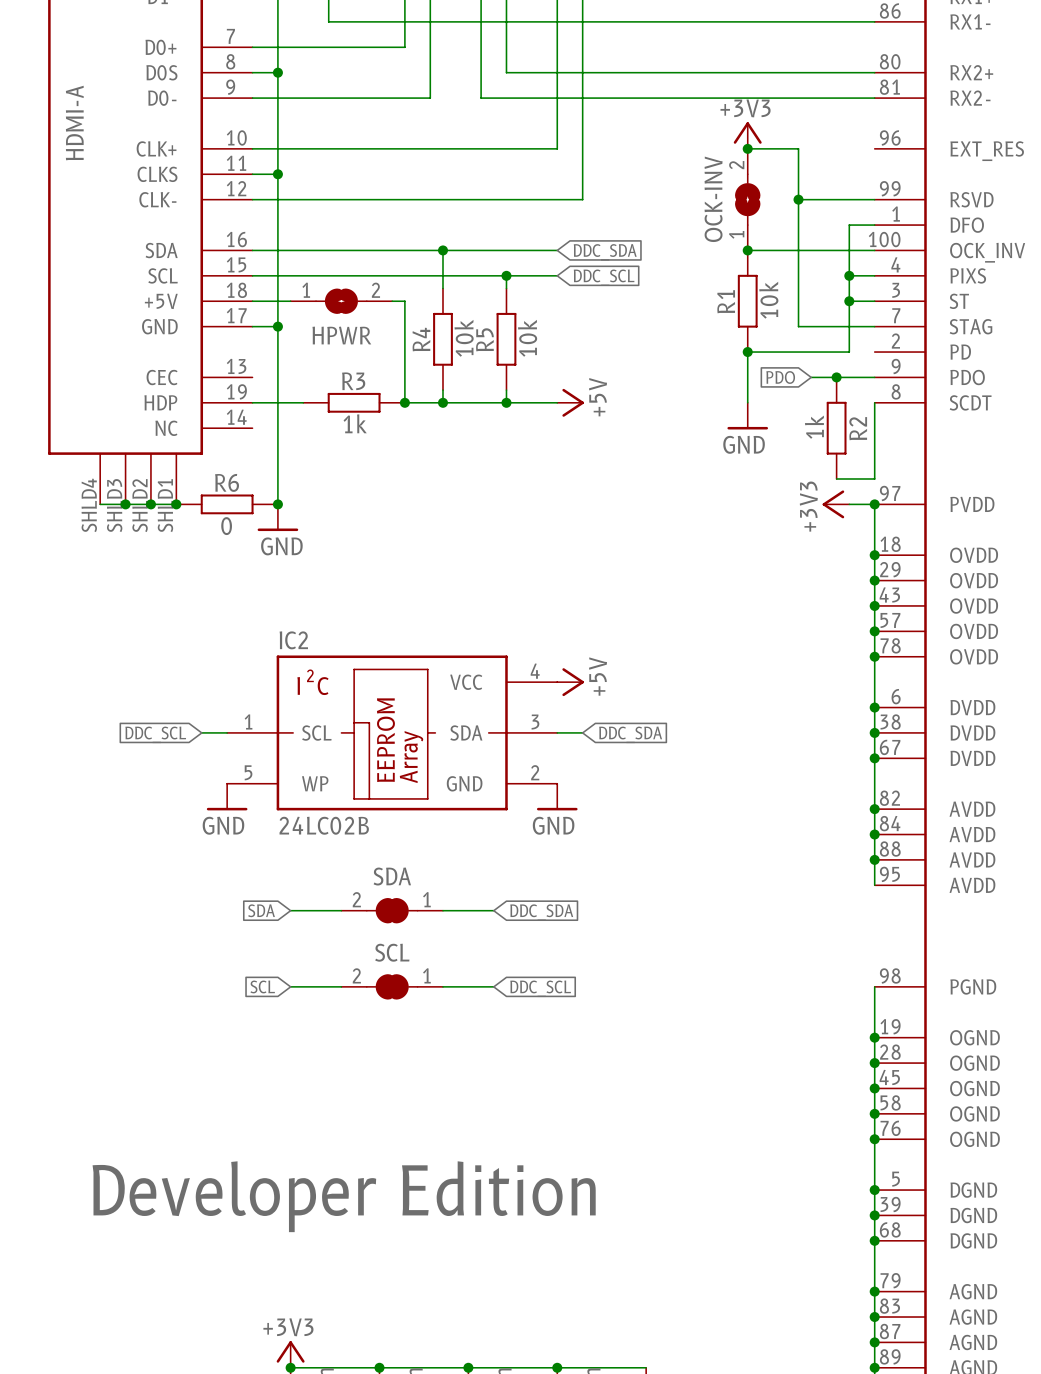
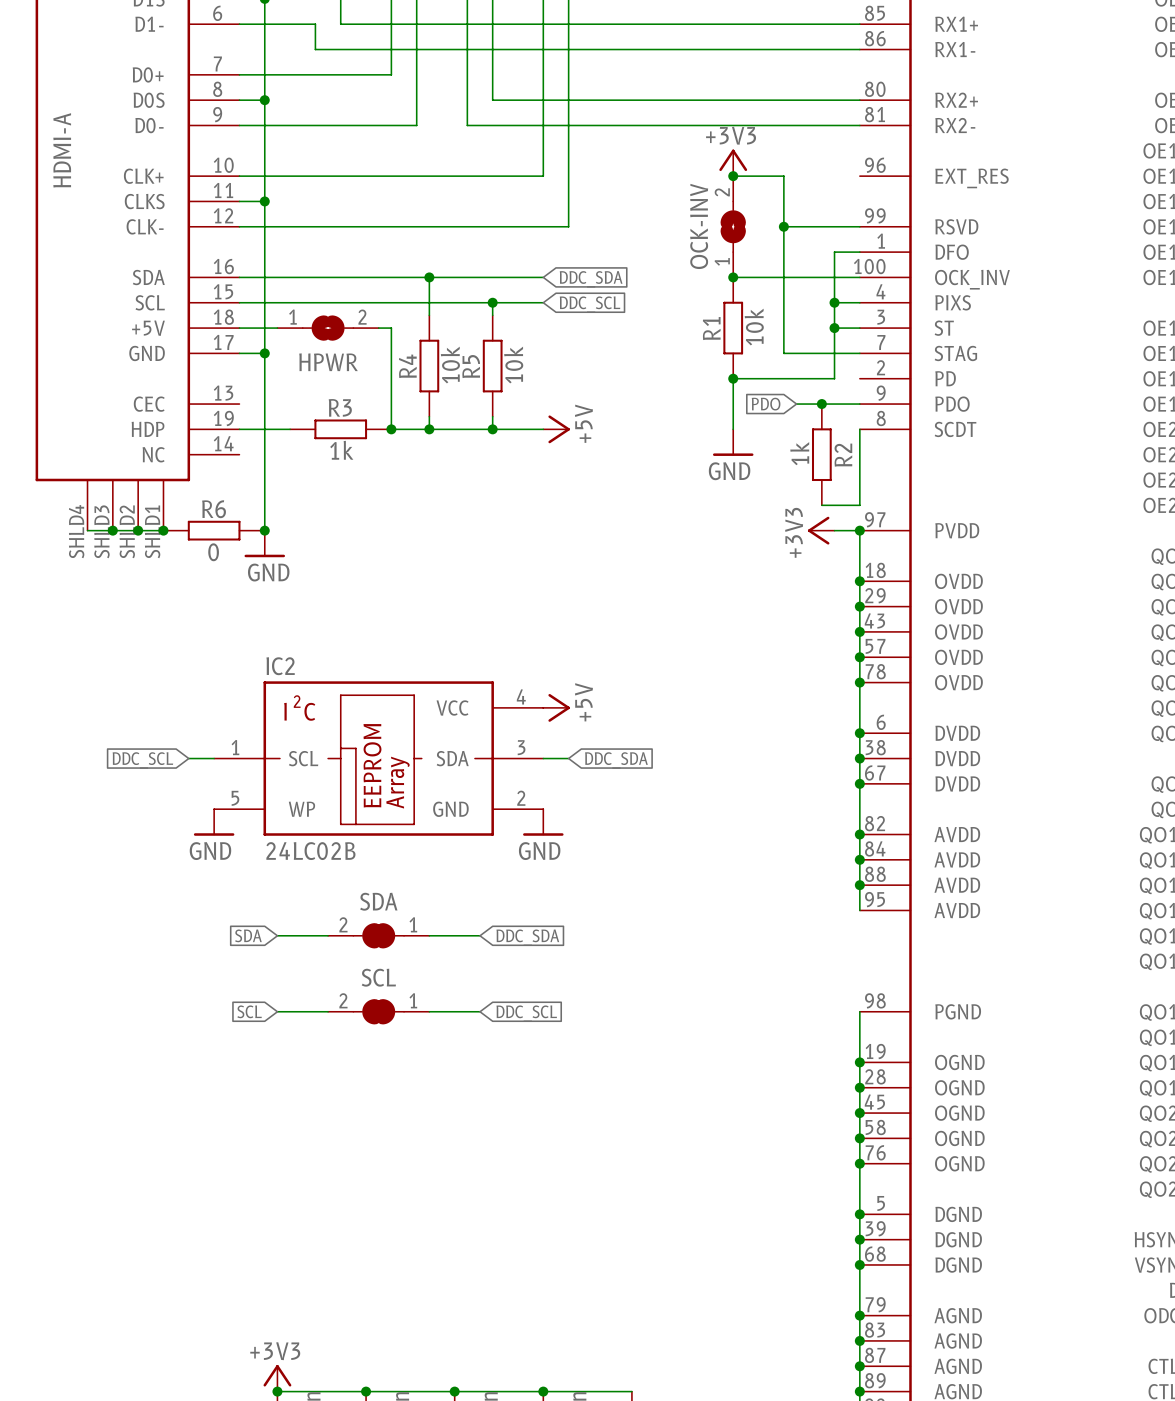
text: Developer Edition (344, 1196) -> none

